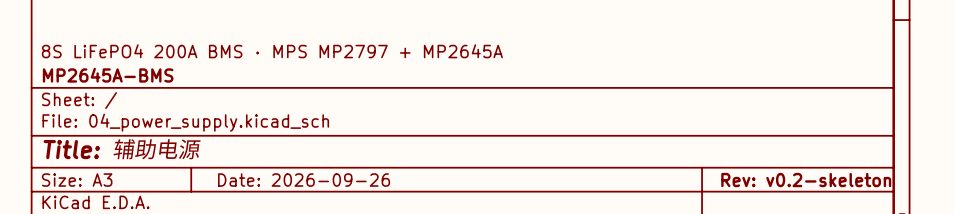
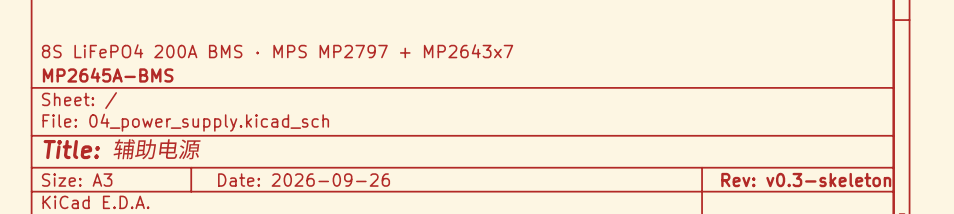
title block: 8S LiFePO4 200A BMS · MPS MP2797 + MP2645A (272, 51) -> 8S LiFePO4 200A BMS · MPS MP2797 + MP2643x7 (277, 51)
title block: Rev: v0.2-skeleton (806, 180) -> Rev: v0.3-skeleton (806, 180)

